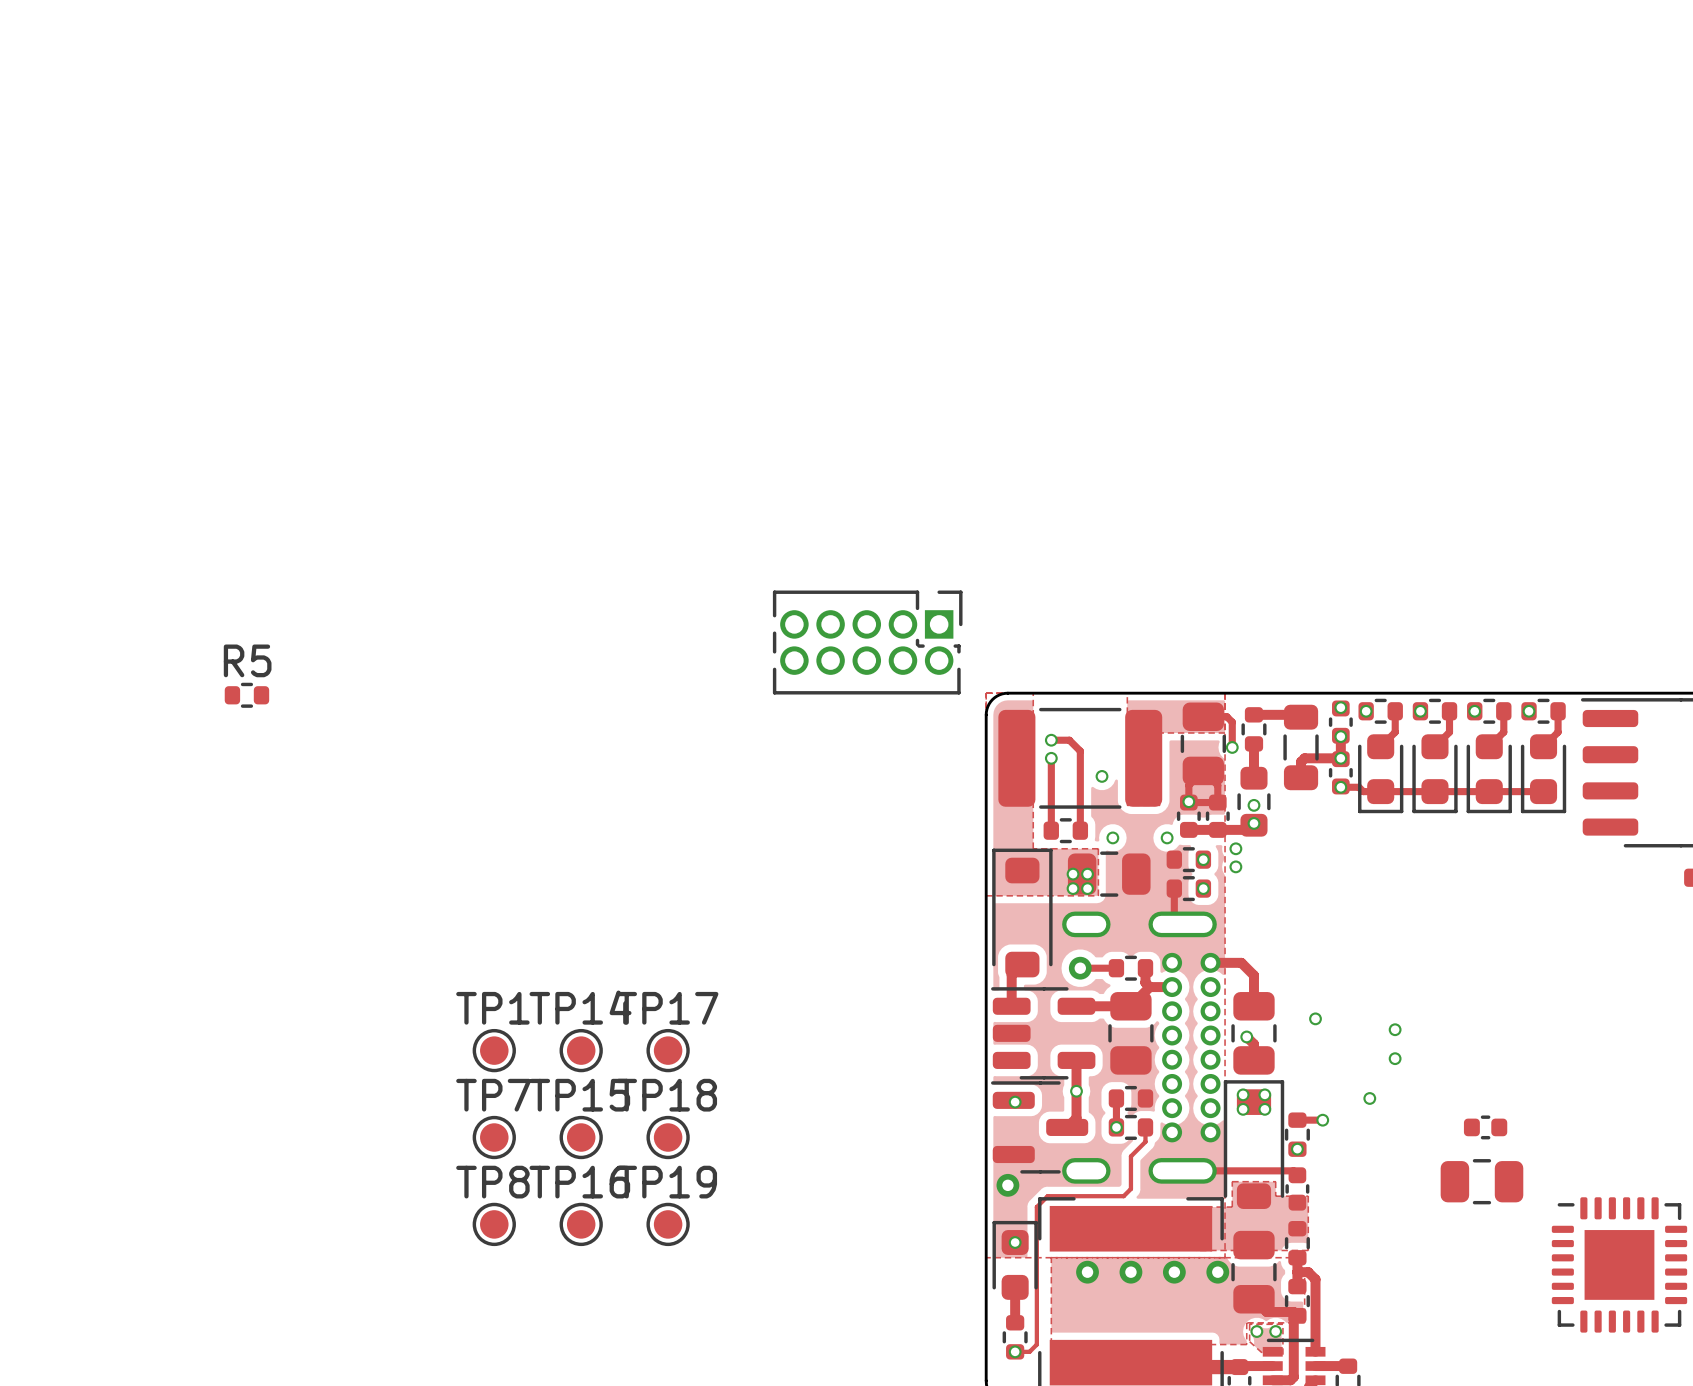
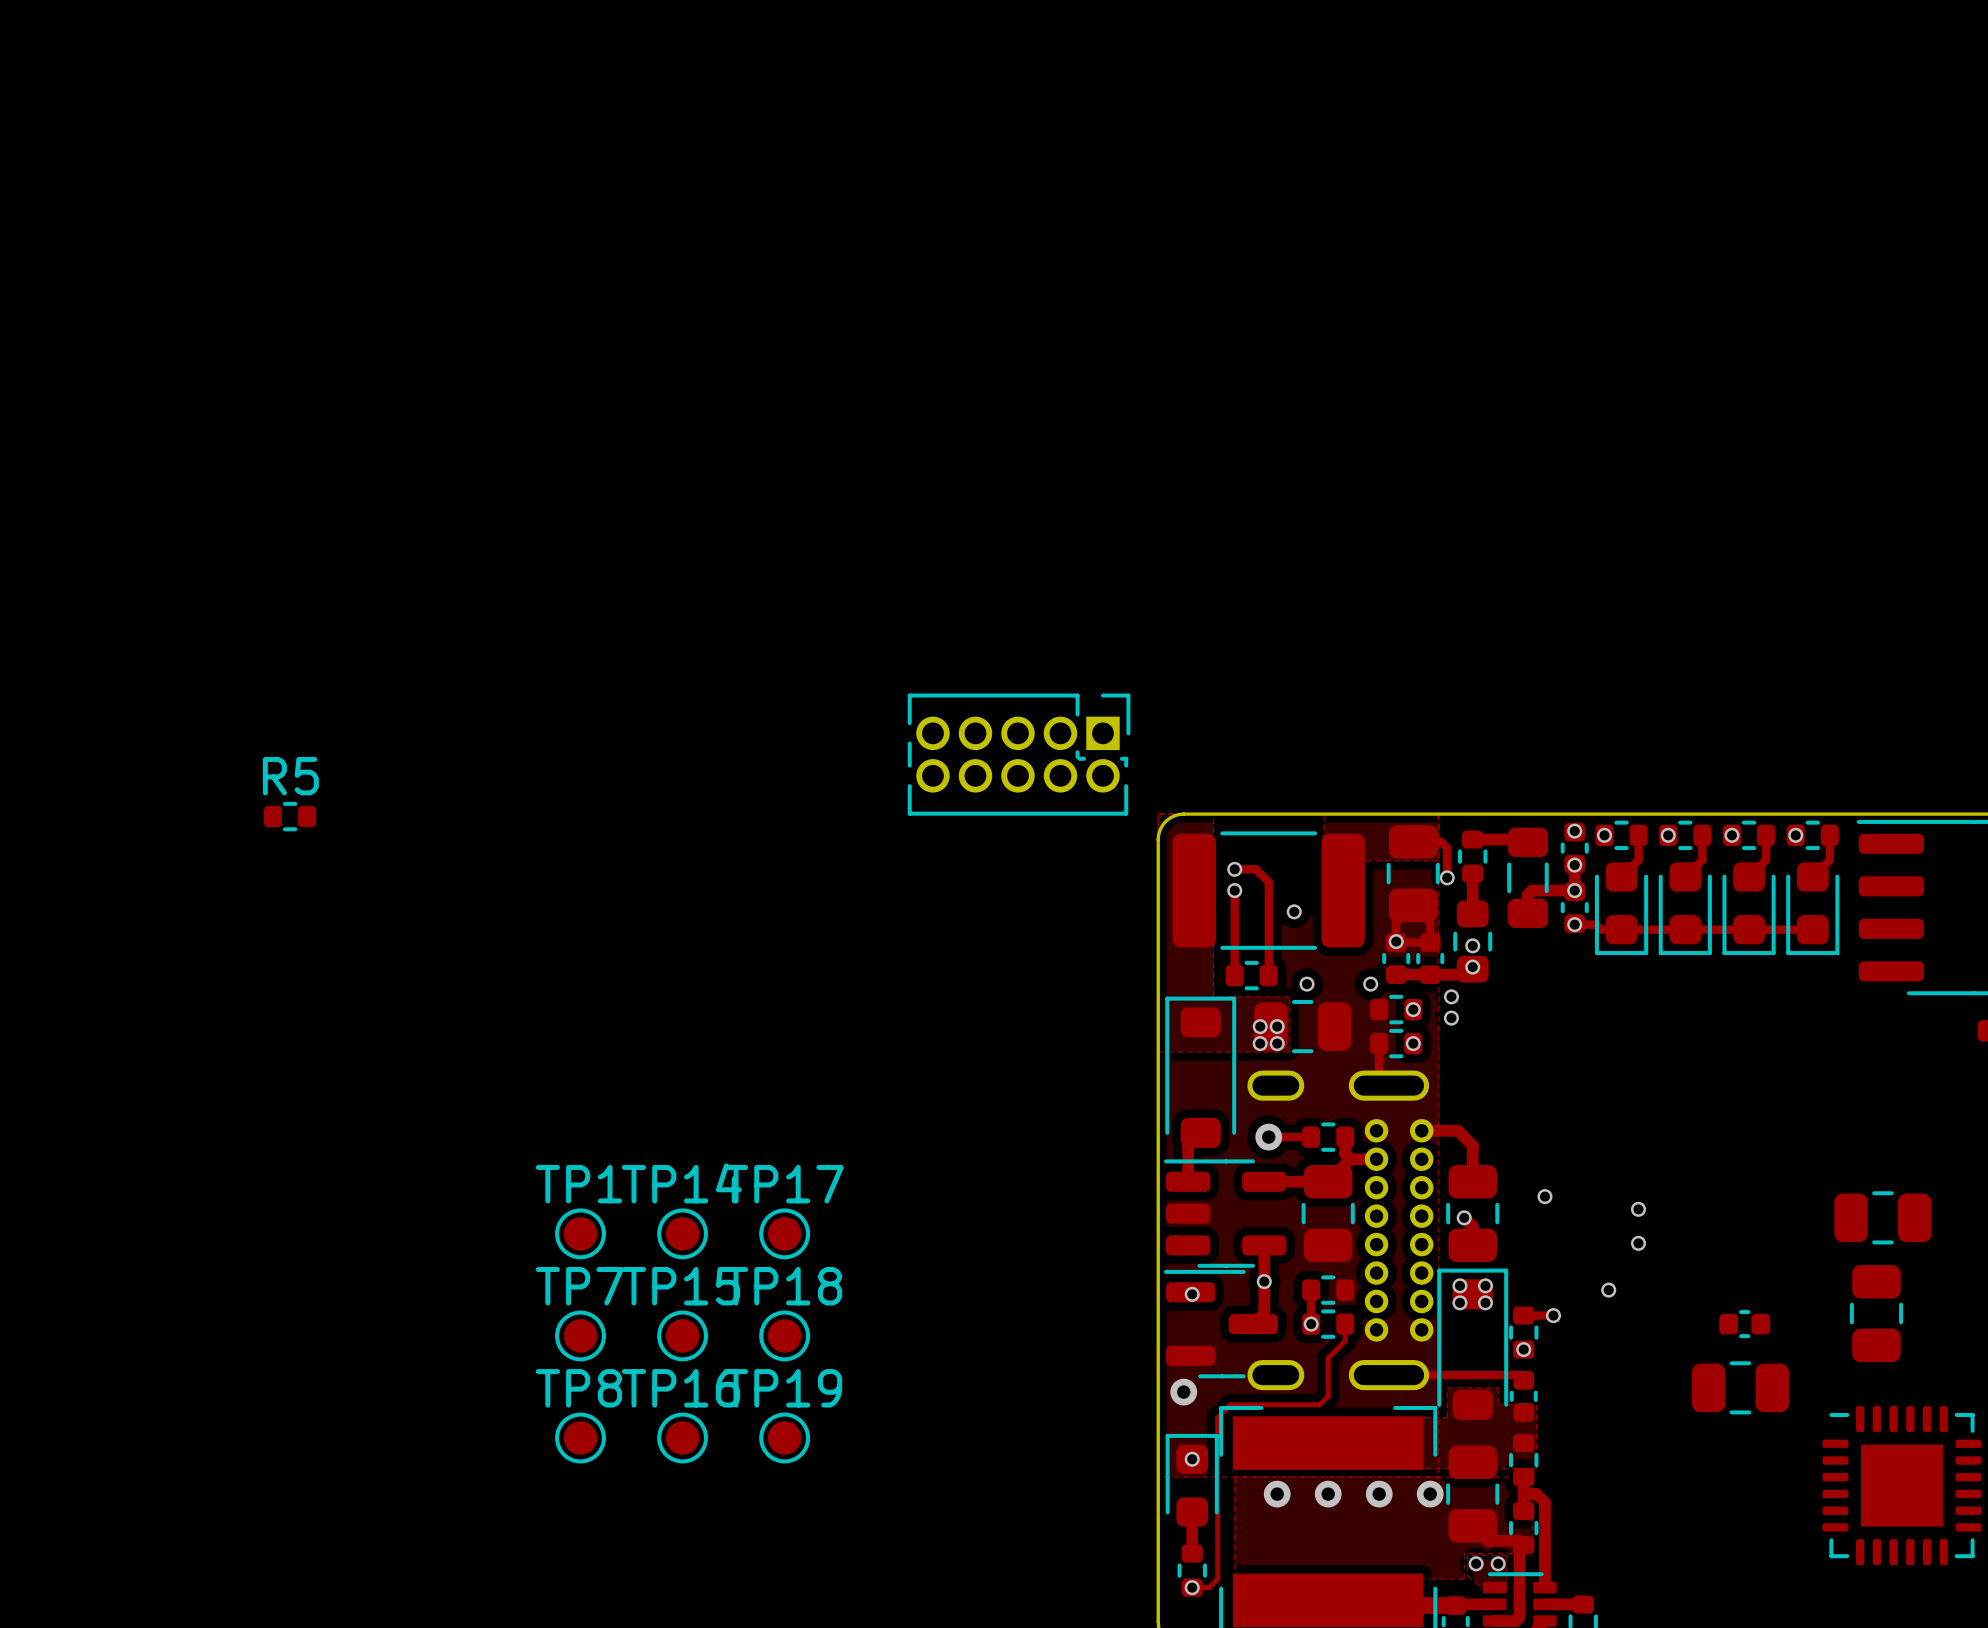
part: none -> (1882, 1217)
part: none -> (1876, 1313)

